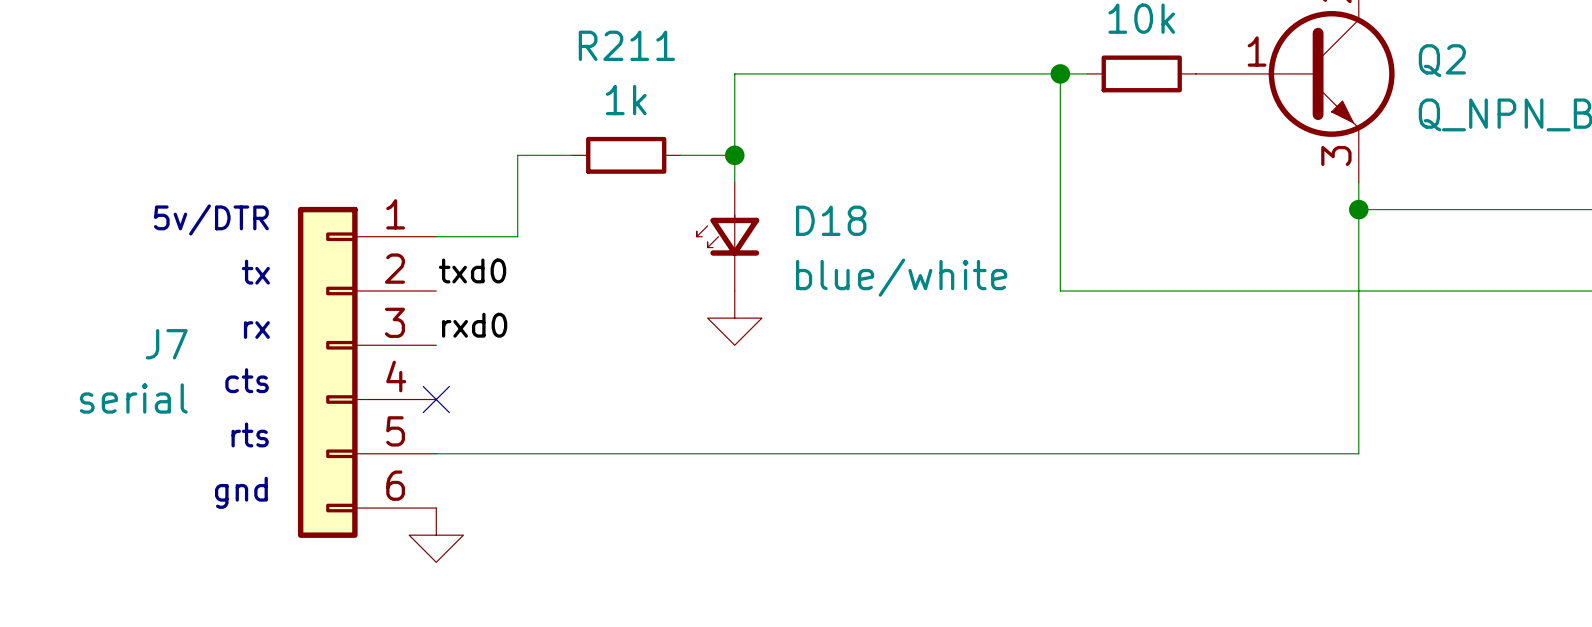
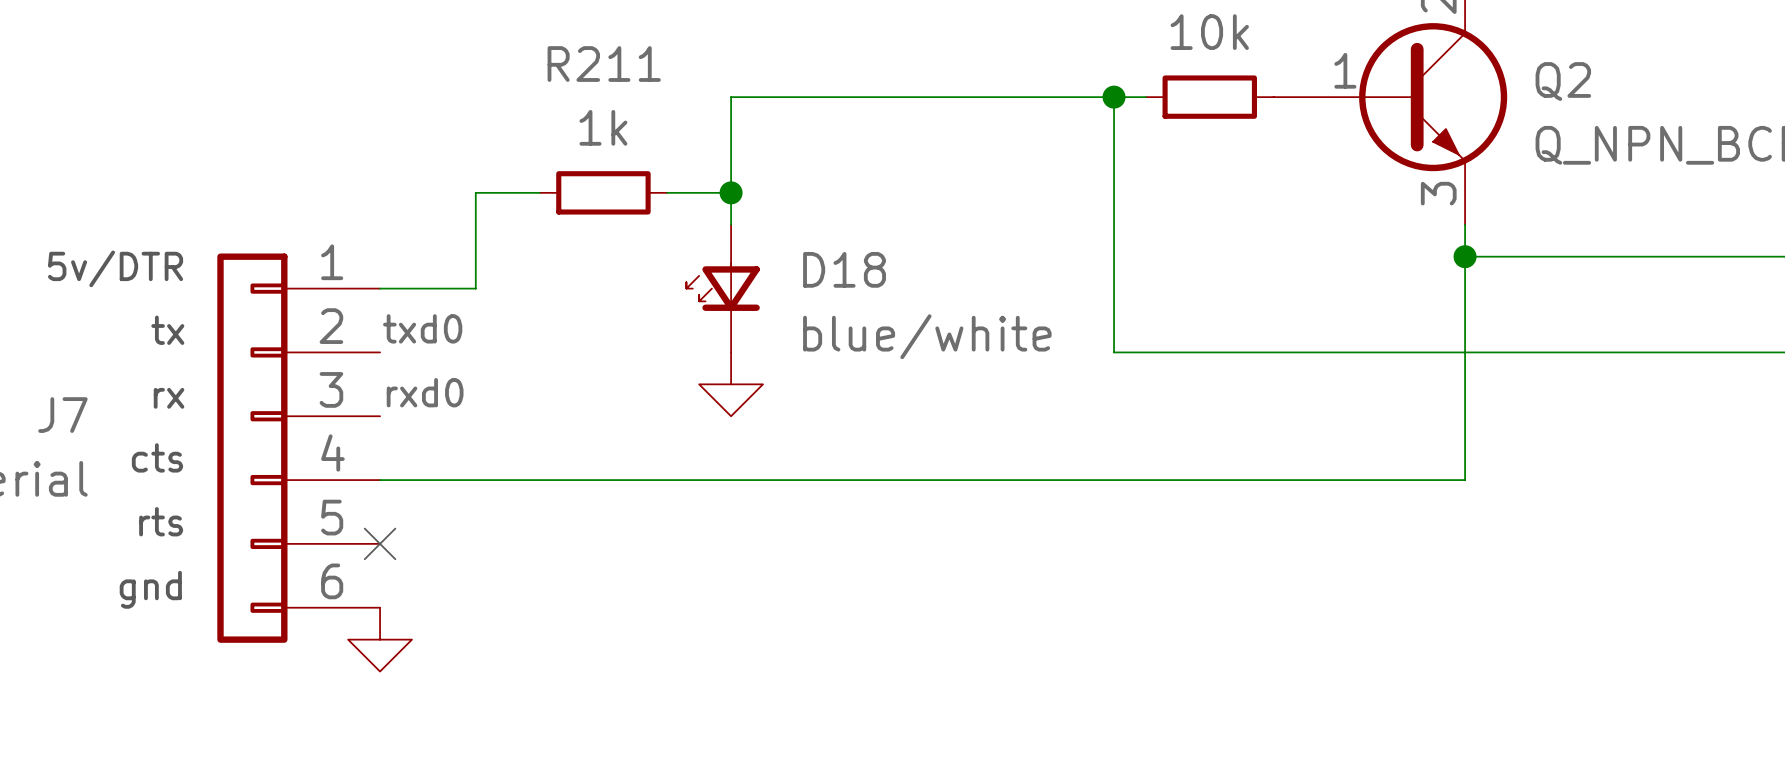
no-connect mark position: (436, 399) -> (380, 543)
wire: (1358, 399) (1358, 453) (436, 453) -> (1465, 480) (380, 480)

